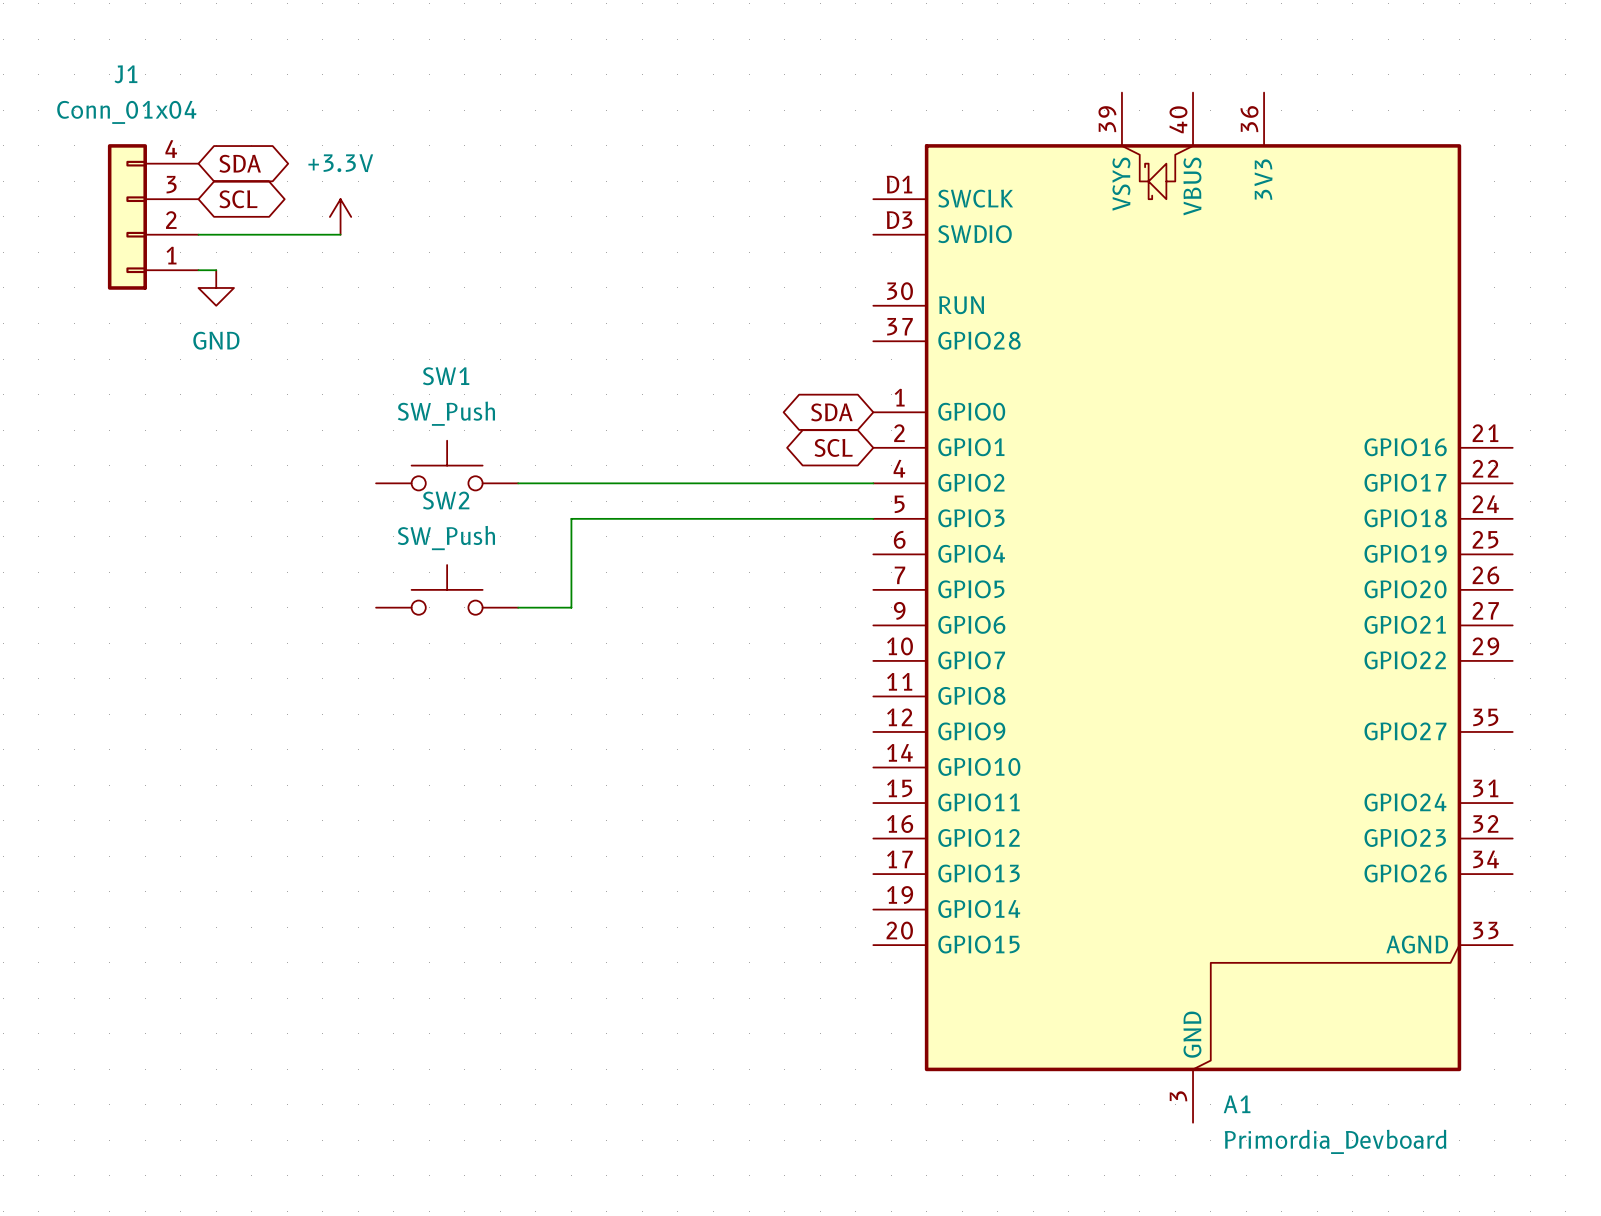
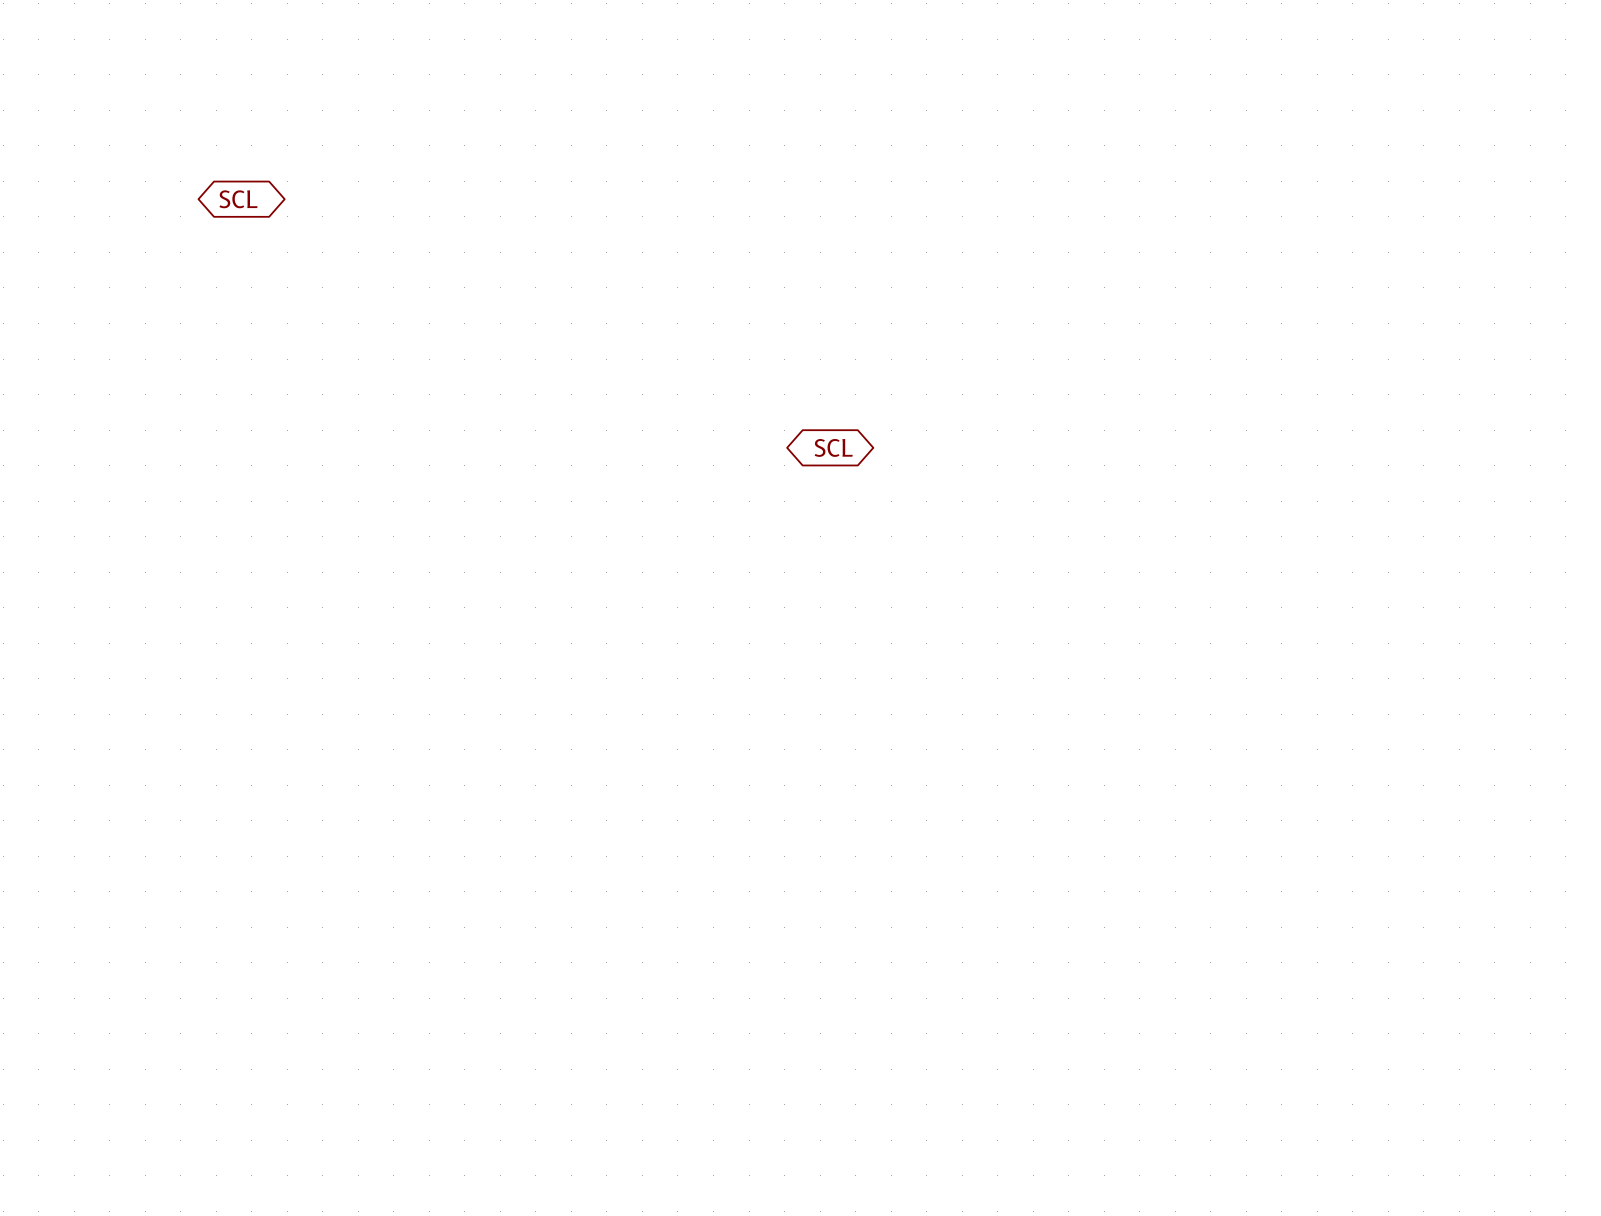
global label: SDA (240, 163) -> none
J1: Conn_01x04 (153, 216) -> none
power symbol: +3.3V (340, 216) -> none
wire: (198, 234) (340, 234) -> none
wire: (198, 270) (216, 270) -> none
power symbol: GND (216, 287) -> none
global label: SDA (831, 412) -> none
SW1: SW_Push (447, 465) -> none
wire: (518, 483) (873, 483) -> none
wire: (873, 518) (571, 518) (571, 607) (518, 607) -> none
SW2: SW_Push (447, 589) -> none
A1: Primordia_Devboard (1193, 607) -> none

